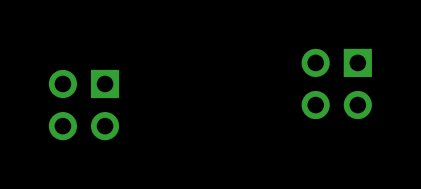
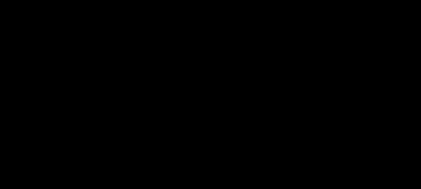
part: (336, 83) -> none
part: (83, 105) -> none

